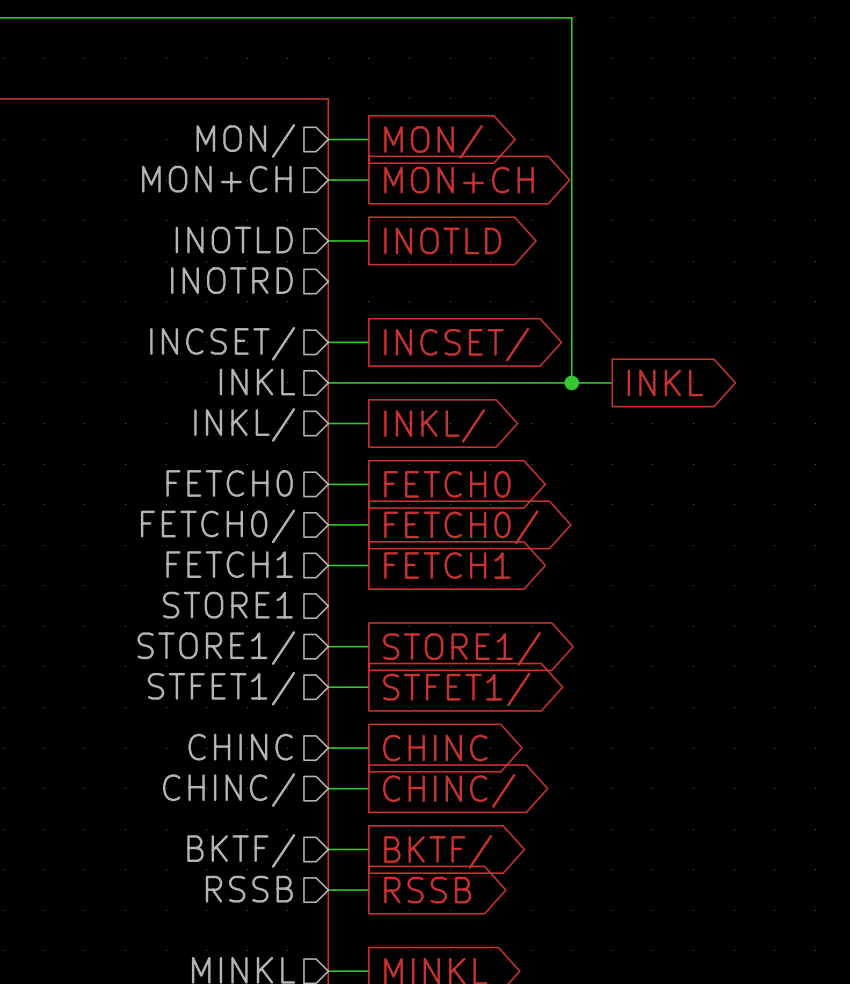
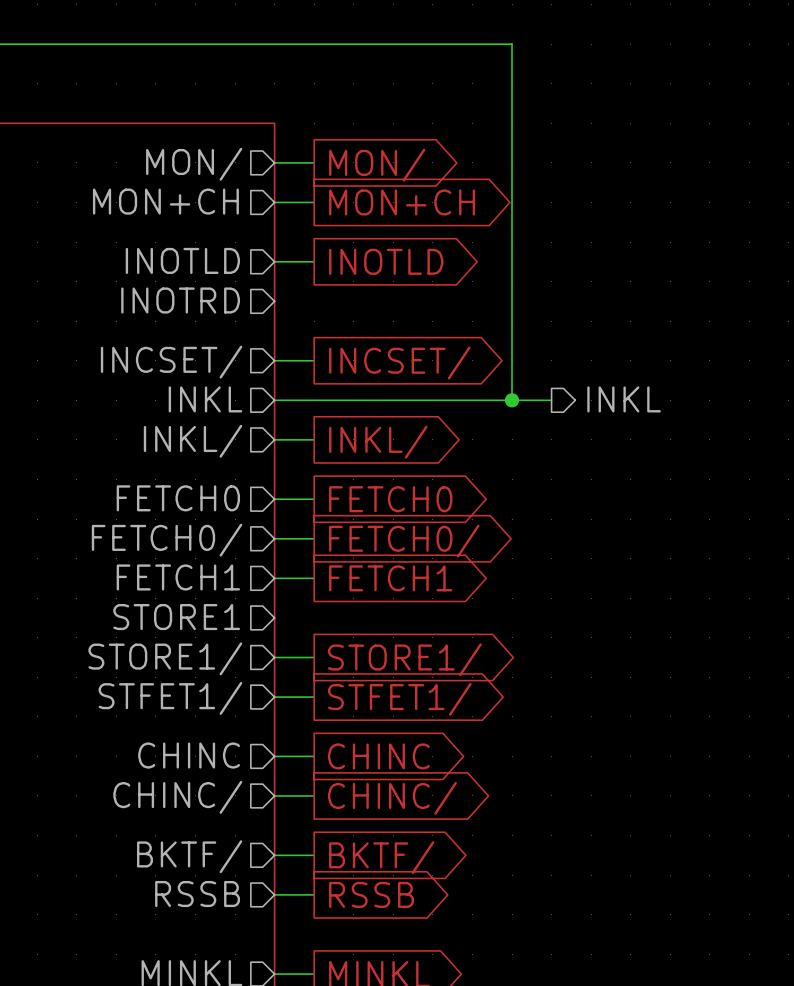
global label: INKL (665, 382) -> none
hierarchical label: none -> INKL (624, 399)

